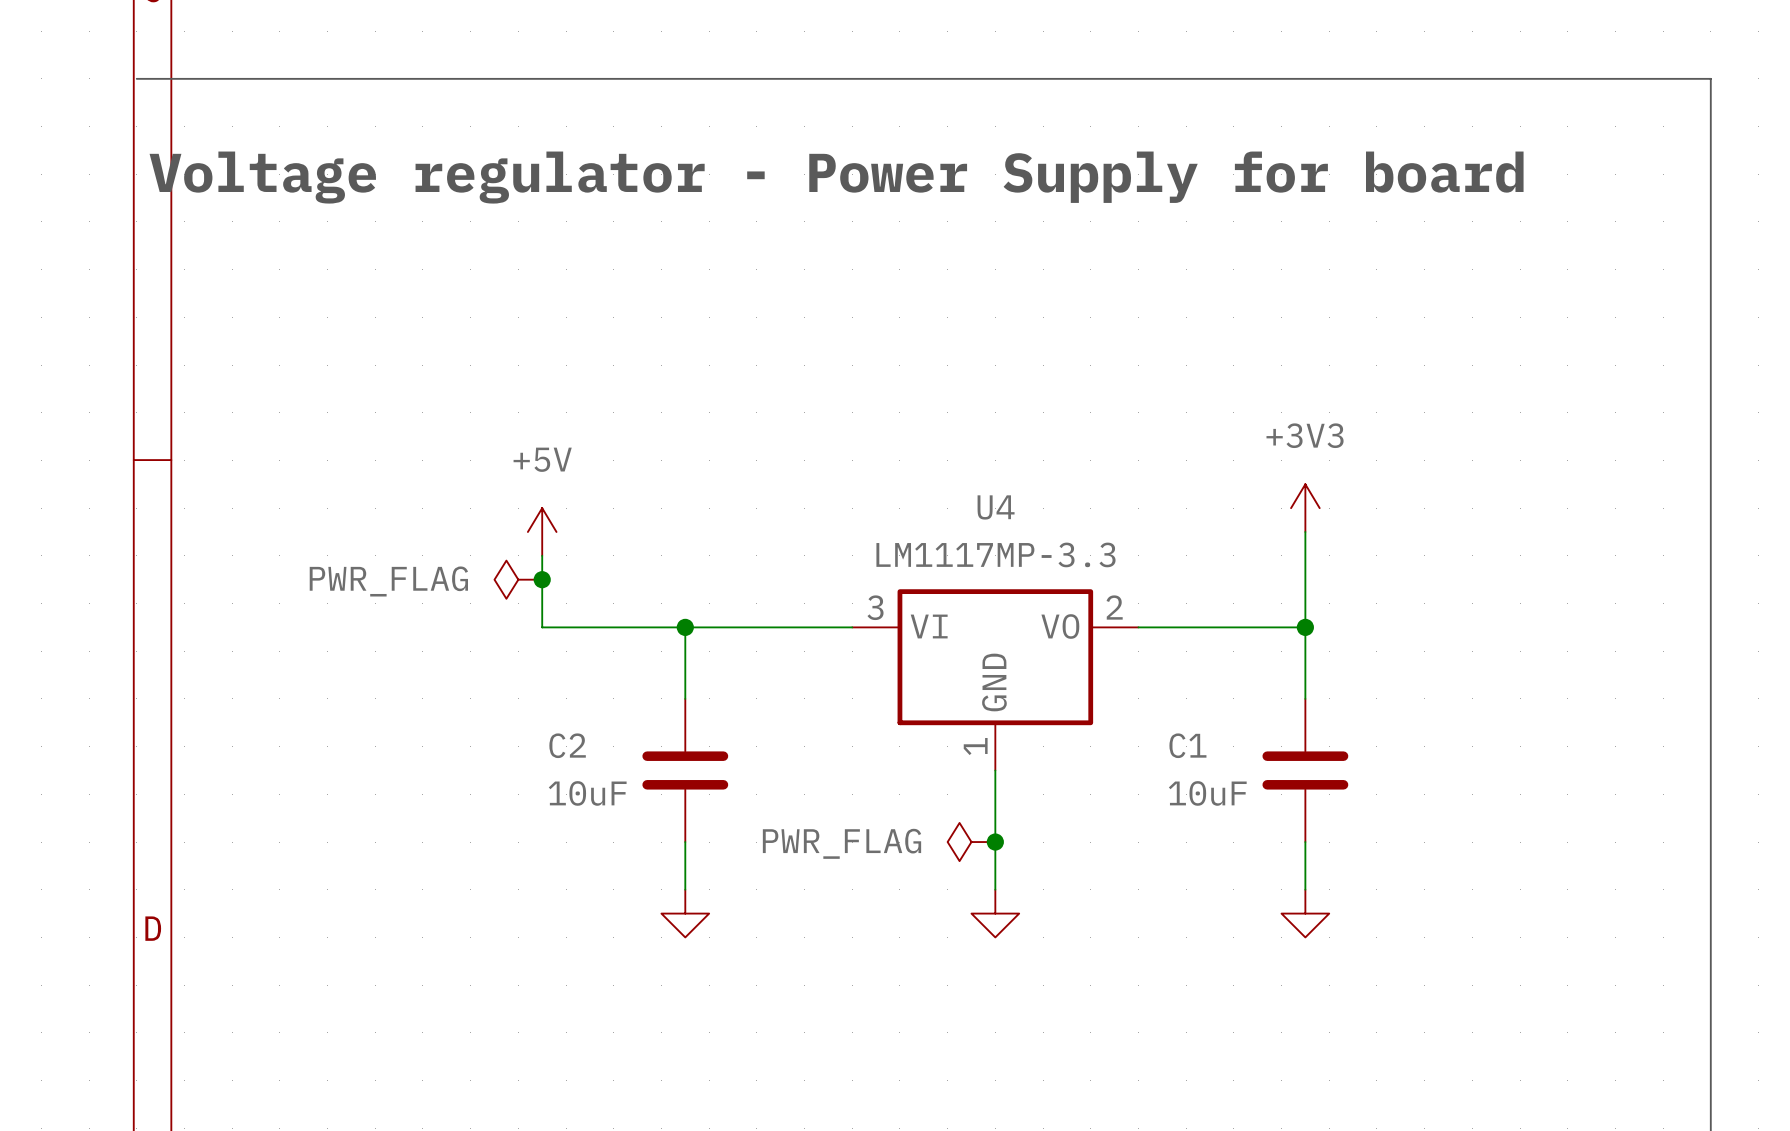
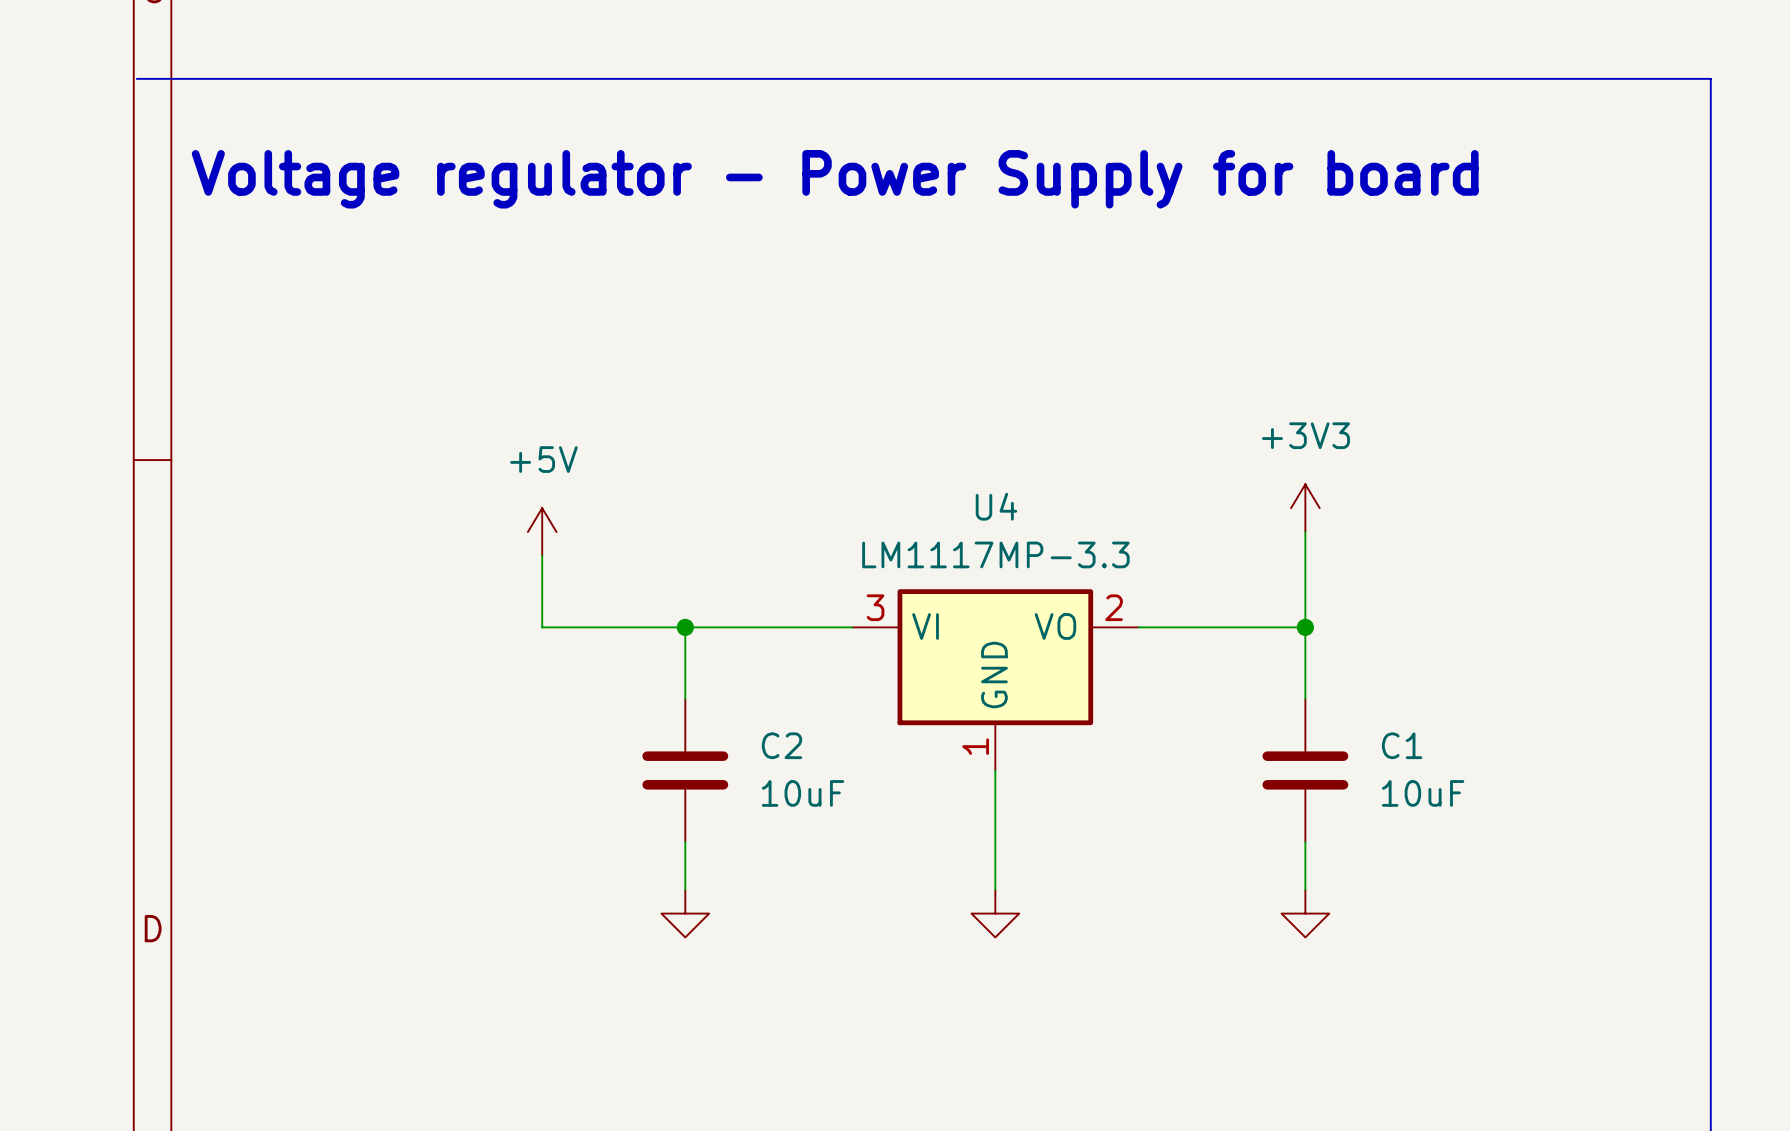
power symbol: PWR_FLAG (518, 579) -> none
junction: (542, 579) -> none
C2 name position: C2 (567, 745) -> C2 (782, 745)
C1 name position: C1 (1187, 745) -> C1 (1402, 745)
C2 value position: 10uF (587, 793) -> 10uF (803, 793)
C1 value position: 10uF (1207, 793) -> 10uF (1423, 793)
power symbol: PWR_FLAG (971, 842) -> none
junction: (995, 842) -> none

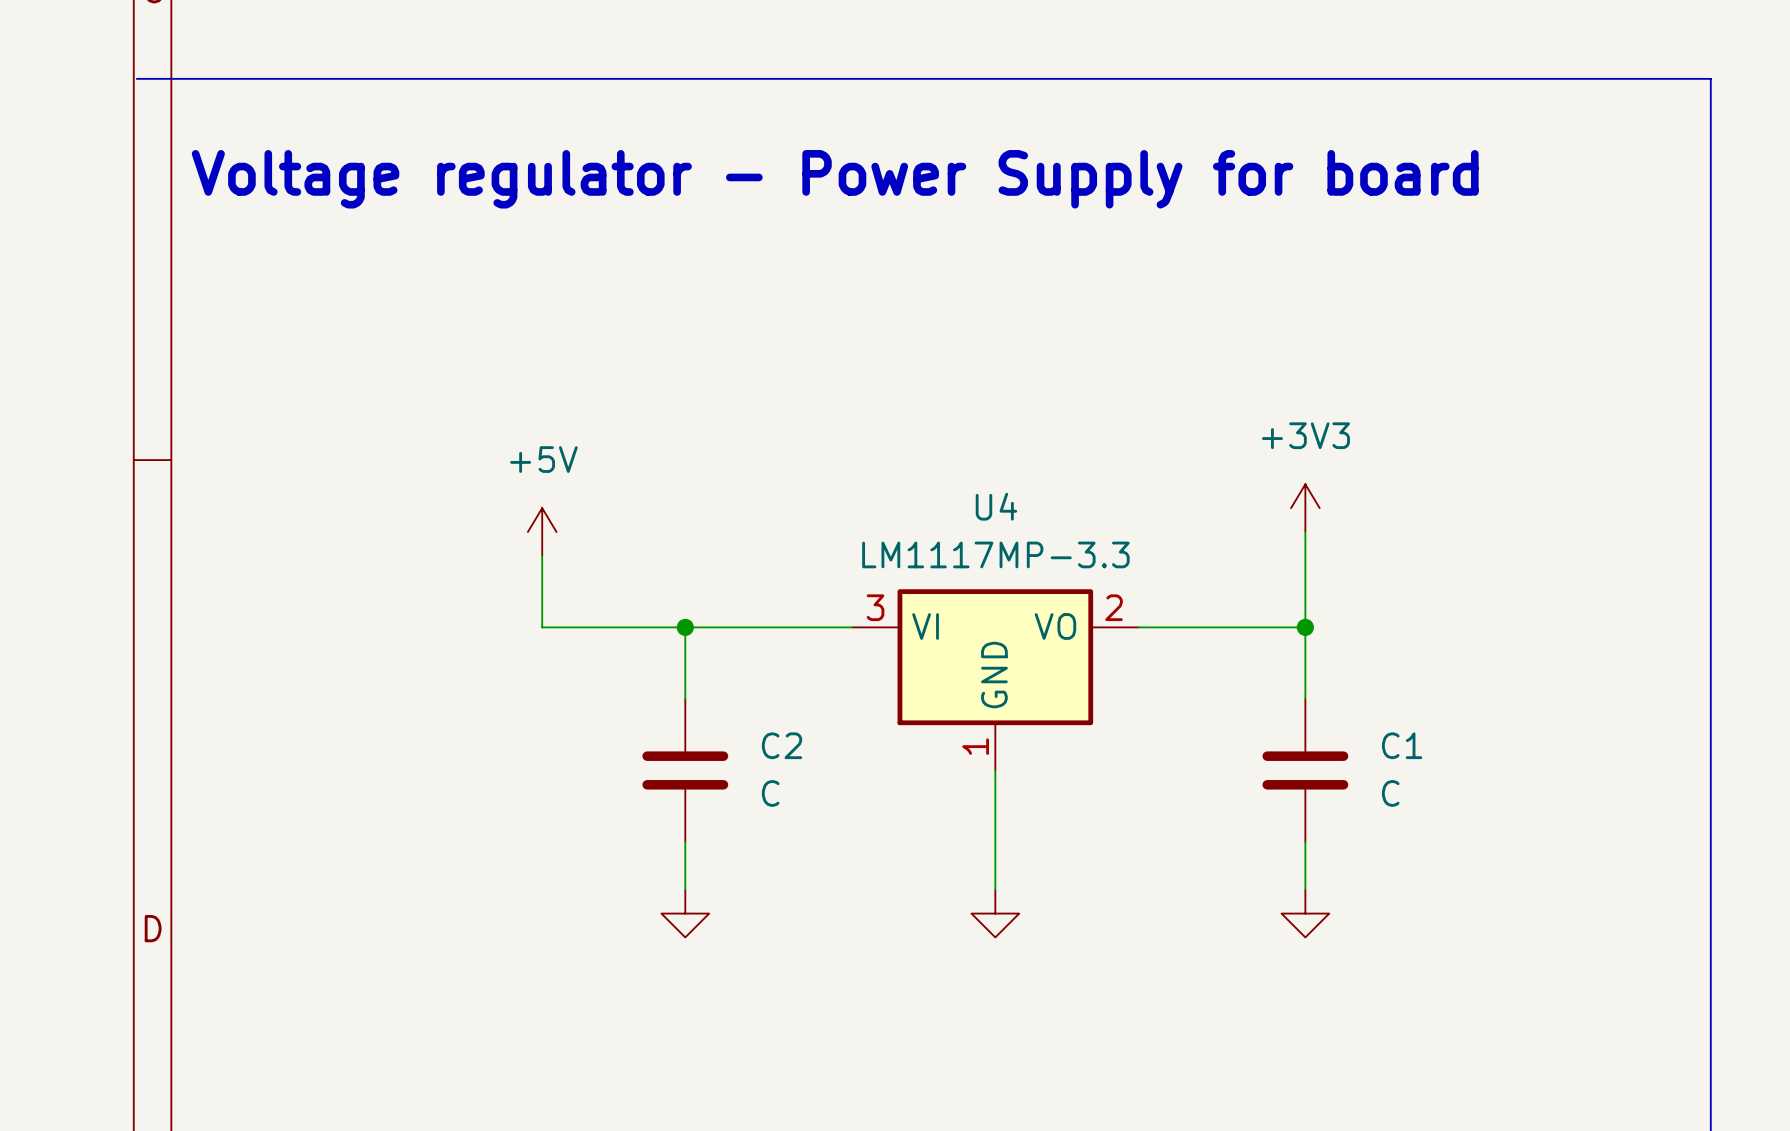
C2 value: 10uF (803, 793) -> C (770, 793)
C1 value: 10uF (1423, 793) -> C (1390, 793)

